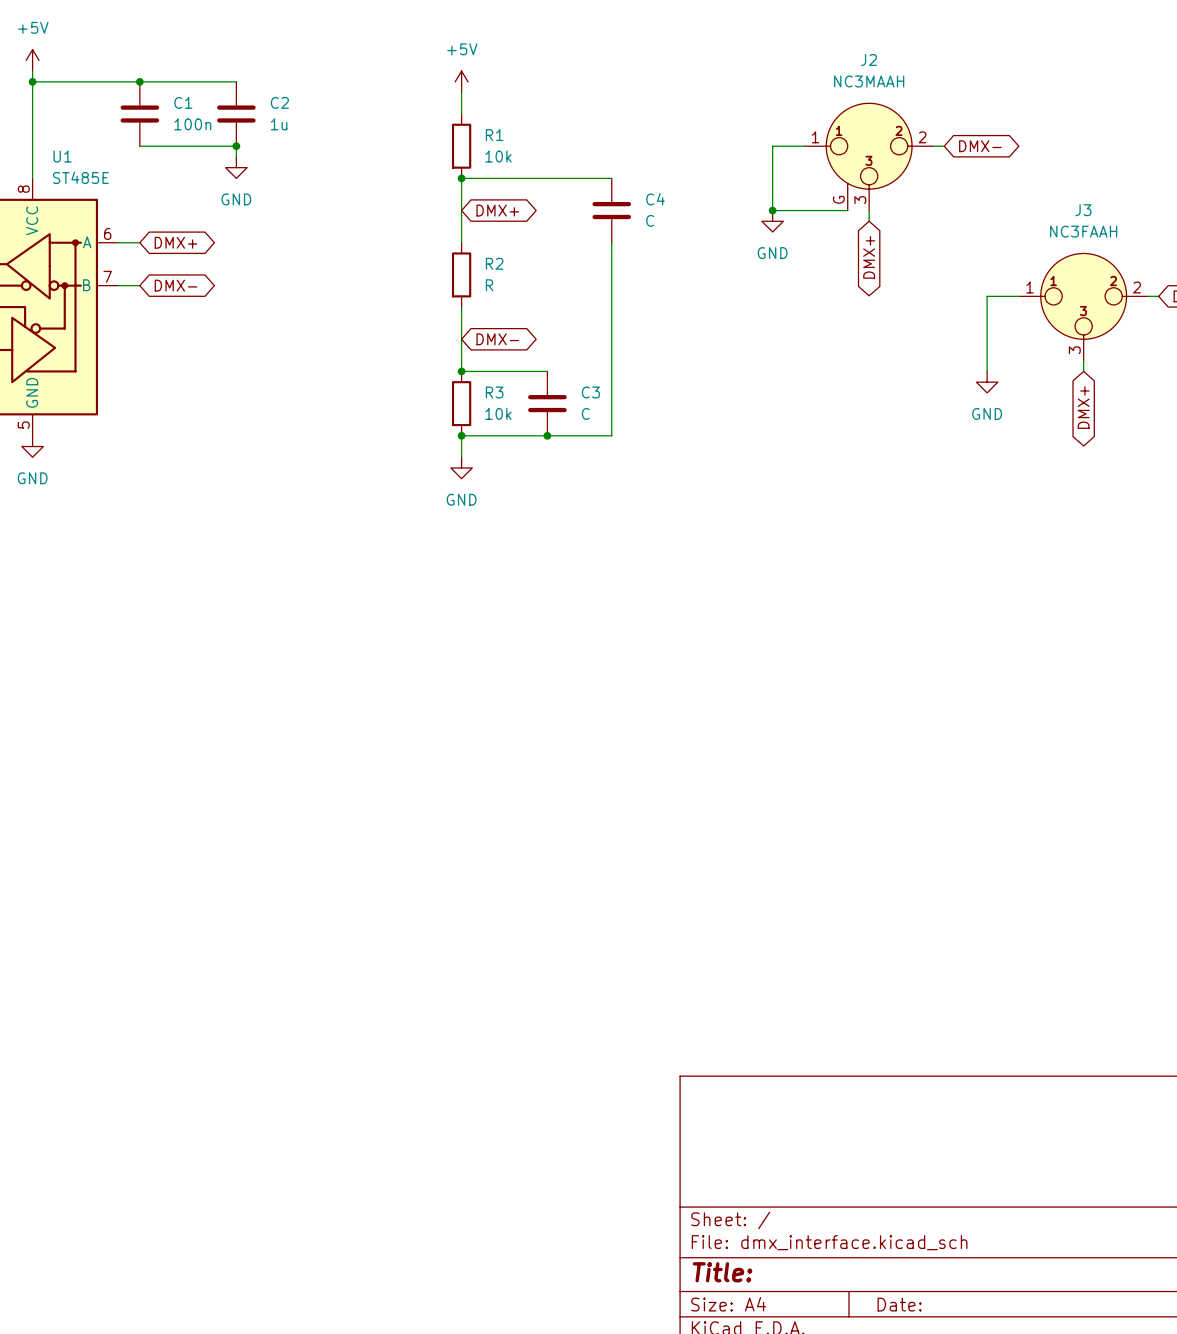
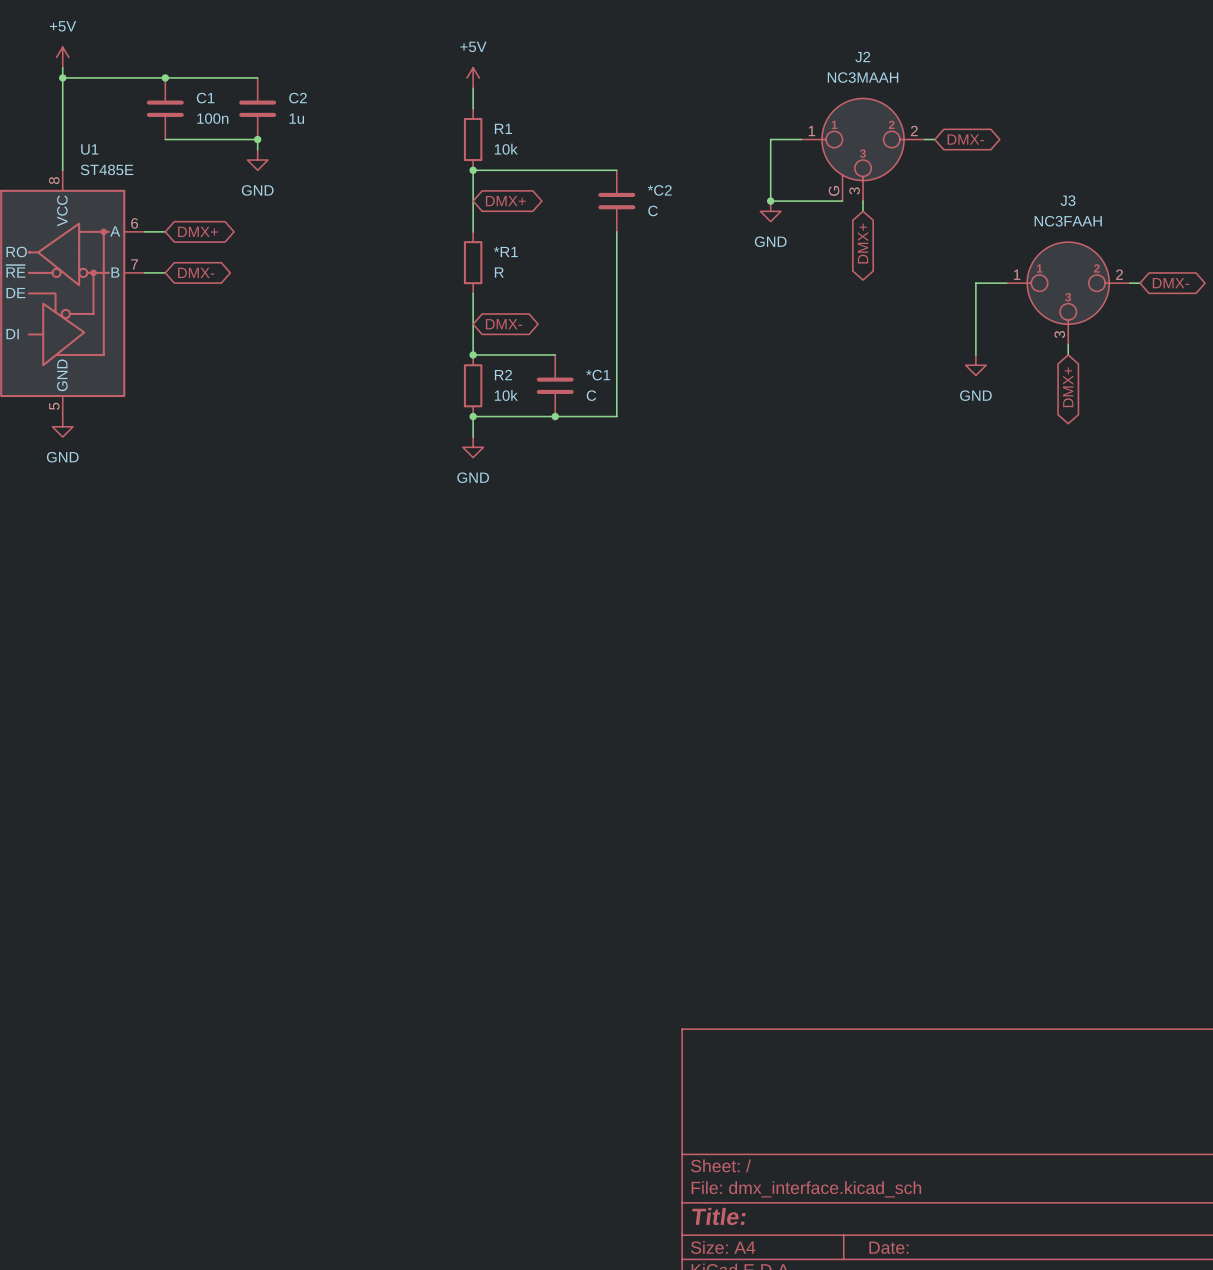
C4 name: C4 (655, 199) -> *C2 (659, 190)
R2 name: R2 (494, 263) -> *R1 (505, 252)
R3 name: R3 (494, 392) -> R2 (503, 375)
C3 name: C3 (590, 392) -> *C1 (598, 375)

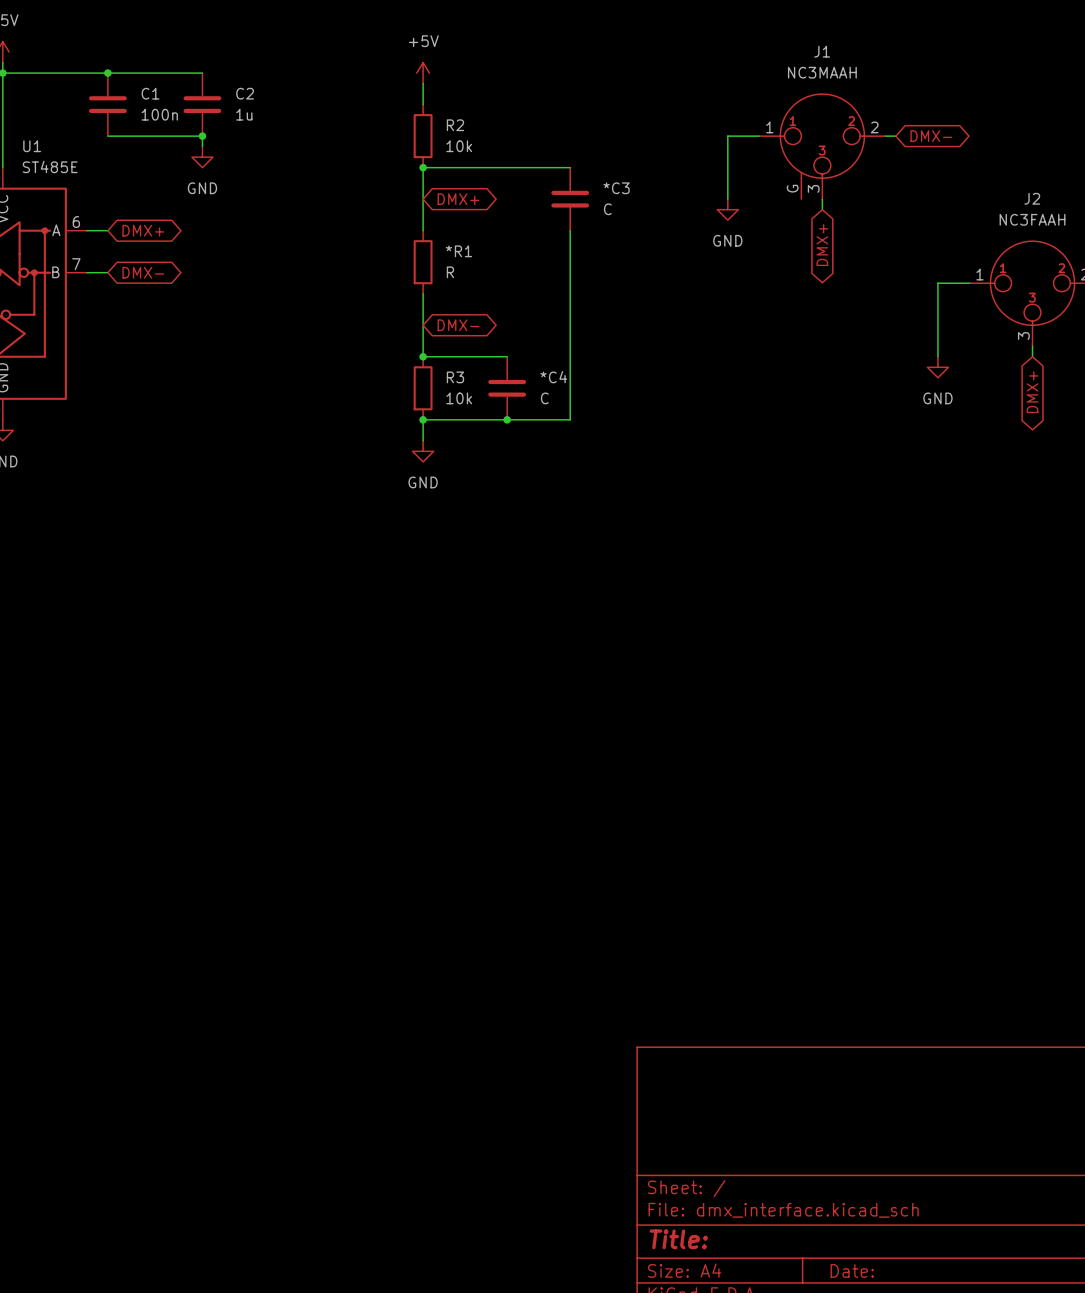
J2 name: J2 (862, 57) -> J1 (822, 51)
R1 name: R1 (503, 128) -> R2 (455, 125)
*C2 name: *C2 (659, 190) -> *C3 (616, 188)
J3 name: J3 (1068, 200) -> J2 (1032, 198)
wire: (770, 201) (842, 201) -> none
junction: (770, 201) -> none
R2 name: R2 (503, 375) -> R3 (455, 377)
*C1 name: *C1 (598, 375) -> *C4 (553, 377)

